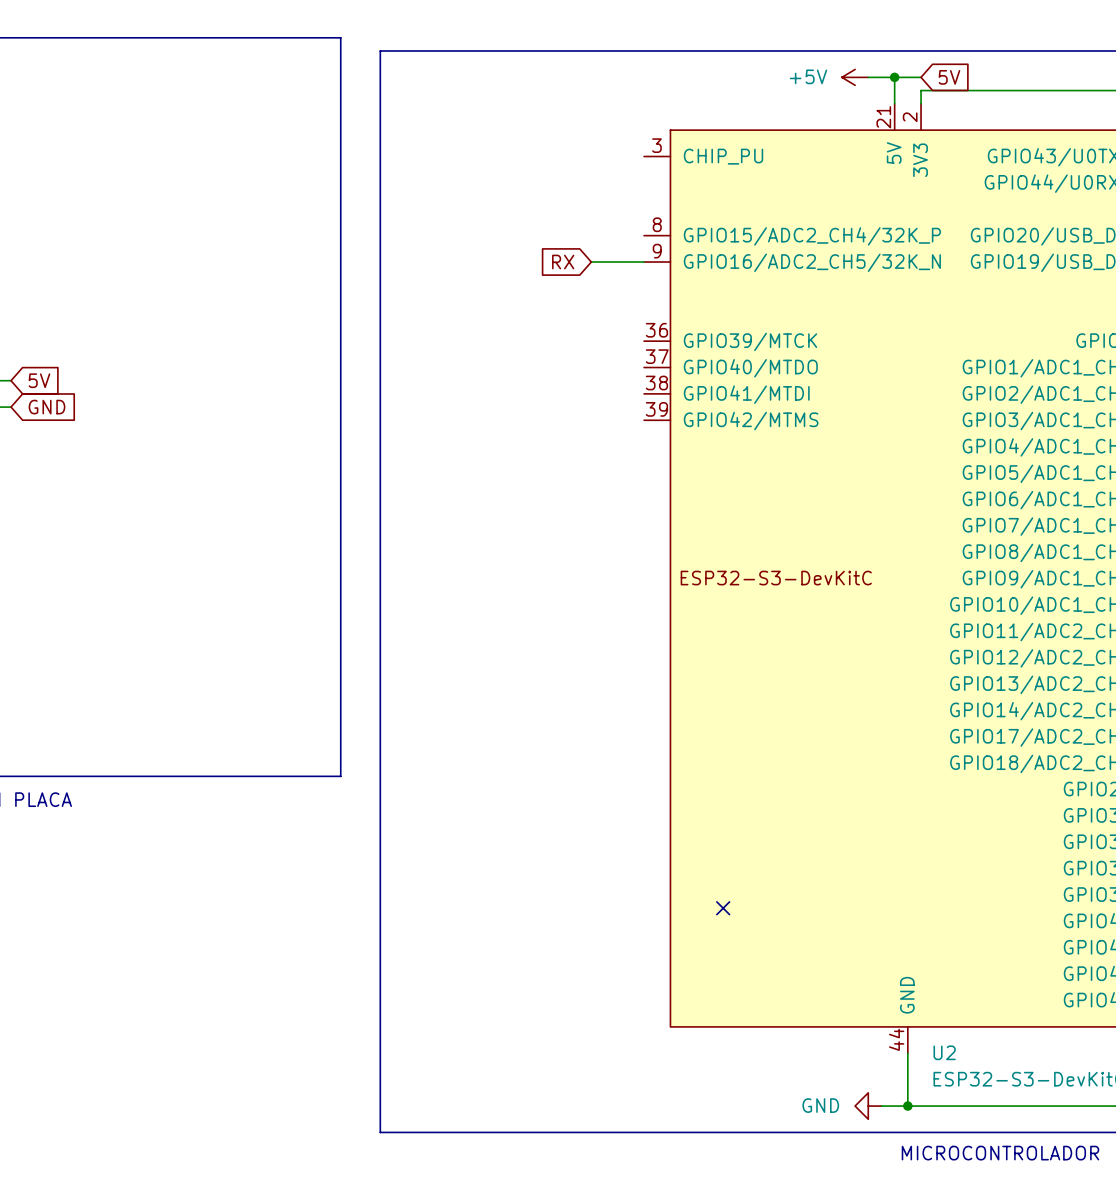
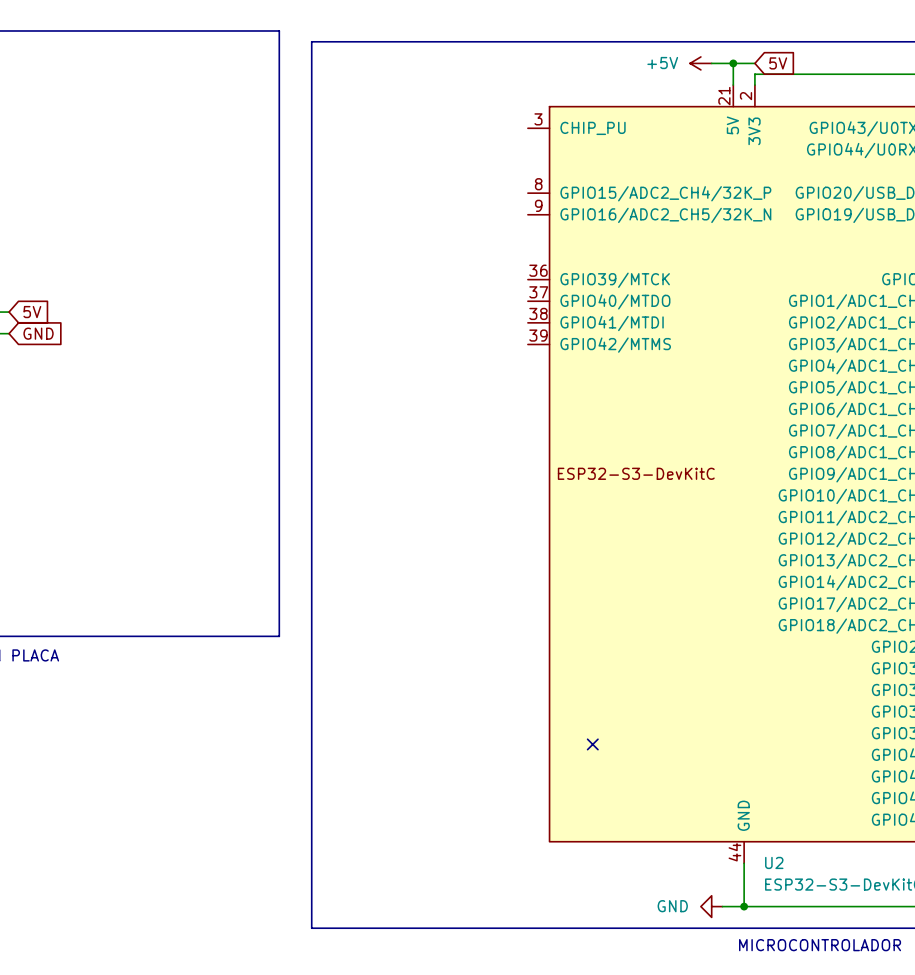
global label: RX (563, 262) -> none
wire: (591, 262) (644, 262) -> none

